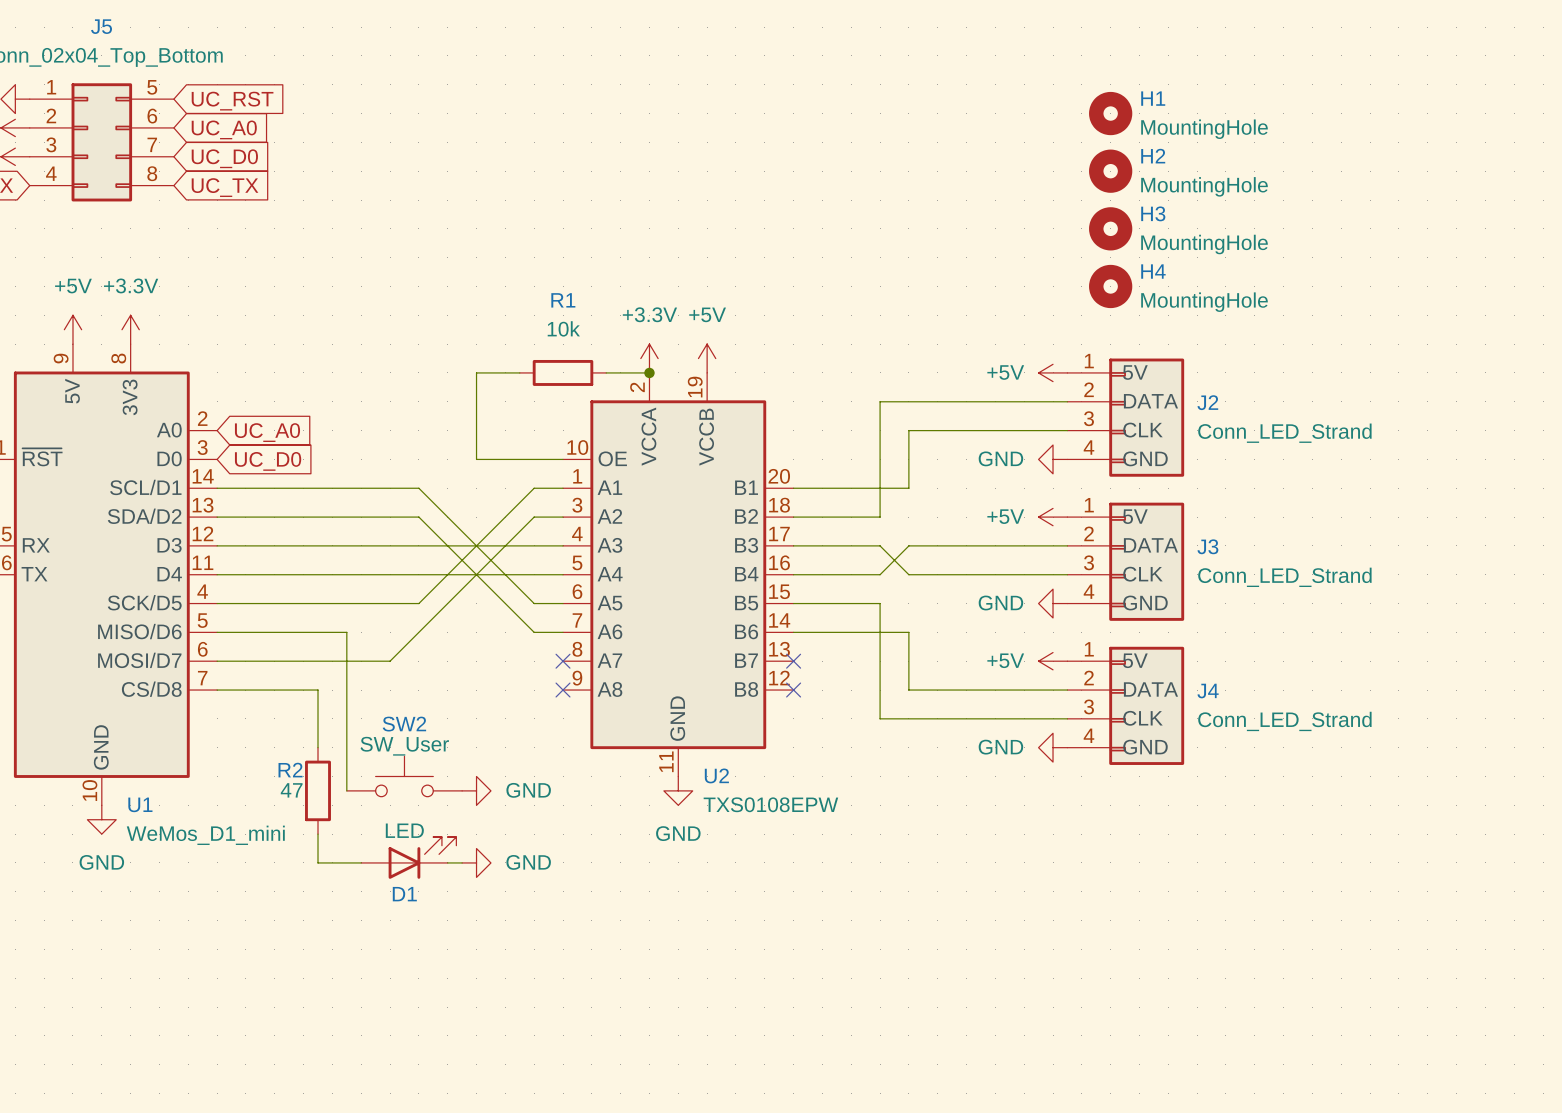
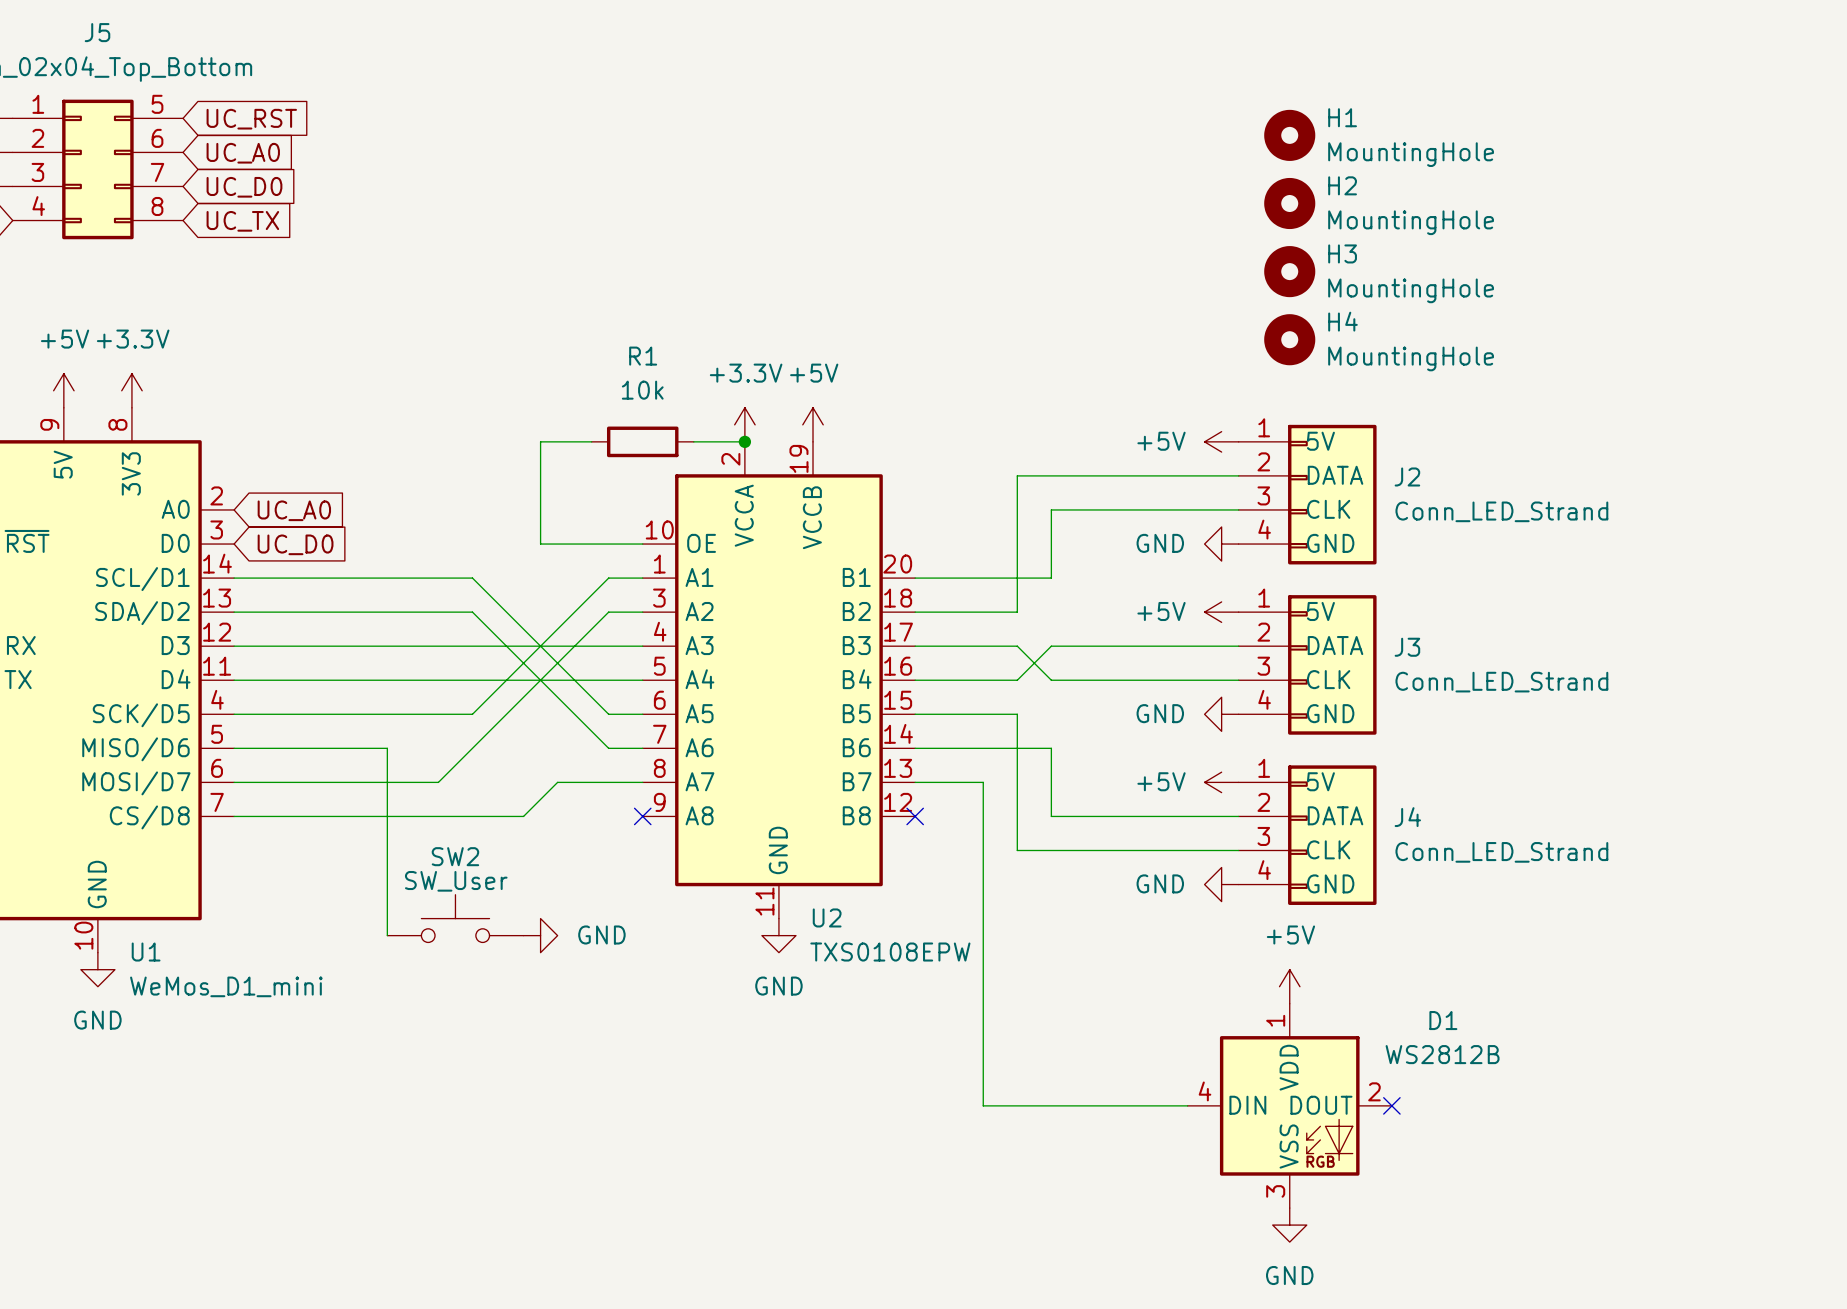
no-connect mark: (563, 661) -> none
wire: none -> (915, 782) (983, 782) (983, 1105) (1187, 1105)
no-connect mark: (793, 661) -> none
wire: (318, 690) (318, 747) -> (353, 816) (523, 816) (557, 782) (642, 782)
R2: 47 (318, 790) -> none
D1 value: LED (404, 830) -> WS2812B (1442, 1054)
wire: (318, 834) (318, 862) (361, 862) -> none
power symbol: none -> +5V (1289, 986)
D1 symbol: [361, 837, 457, 879] -> [1187, 1003, 1392, 1209]
wire: (447, 862) (462, 862) -> none
power symbol: GND (476, 862) -> none
D1 name position: D1 (404, 894) -> D1 (1443, 1020)
no-connect mark: none -> (1391, 1105)
power symbol: none -> GND (1289, 1225)

